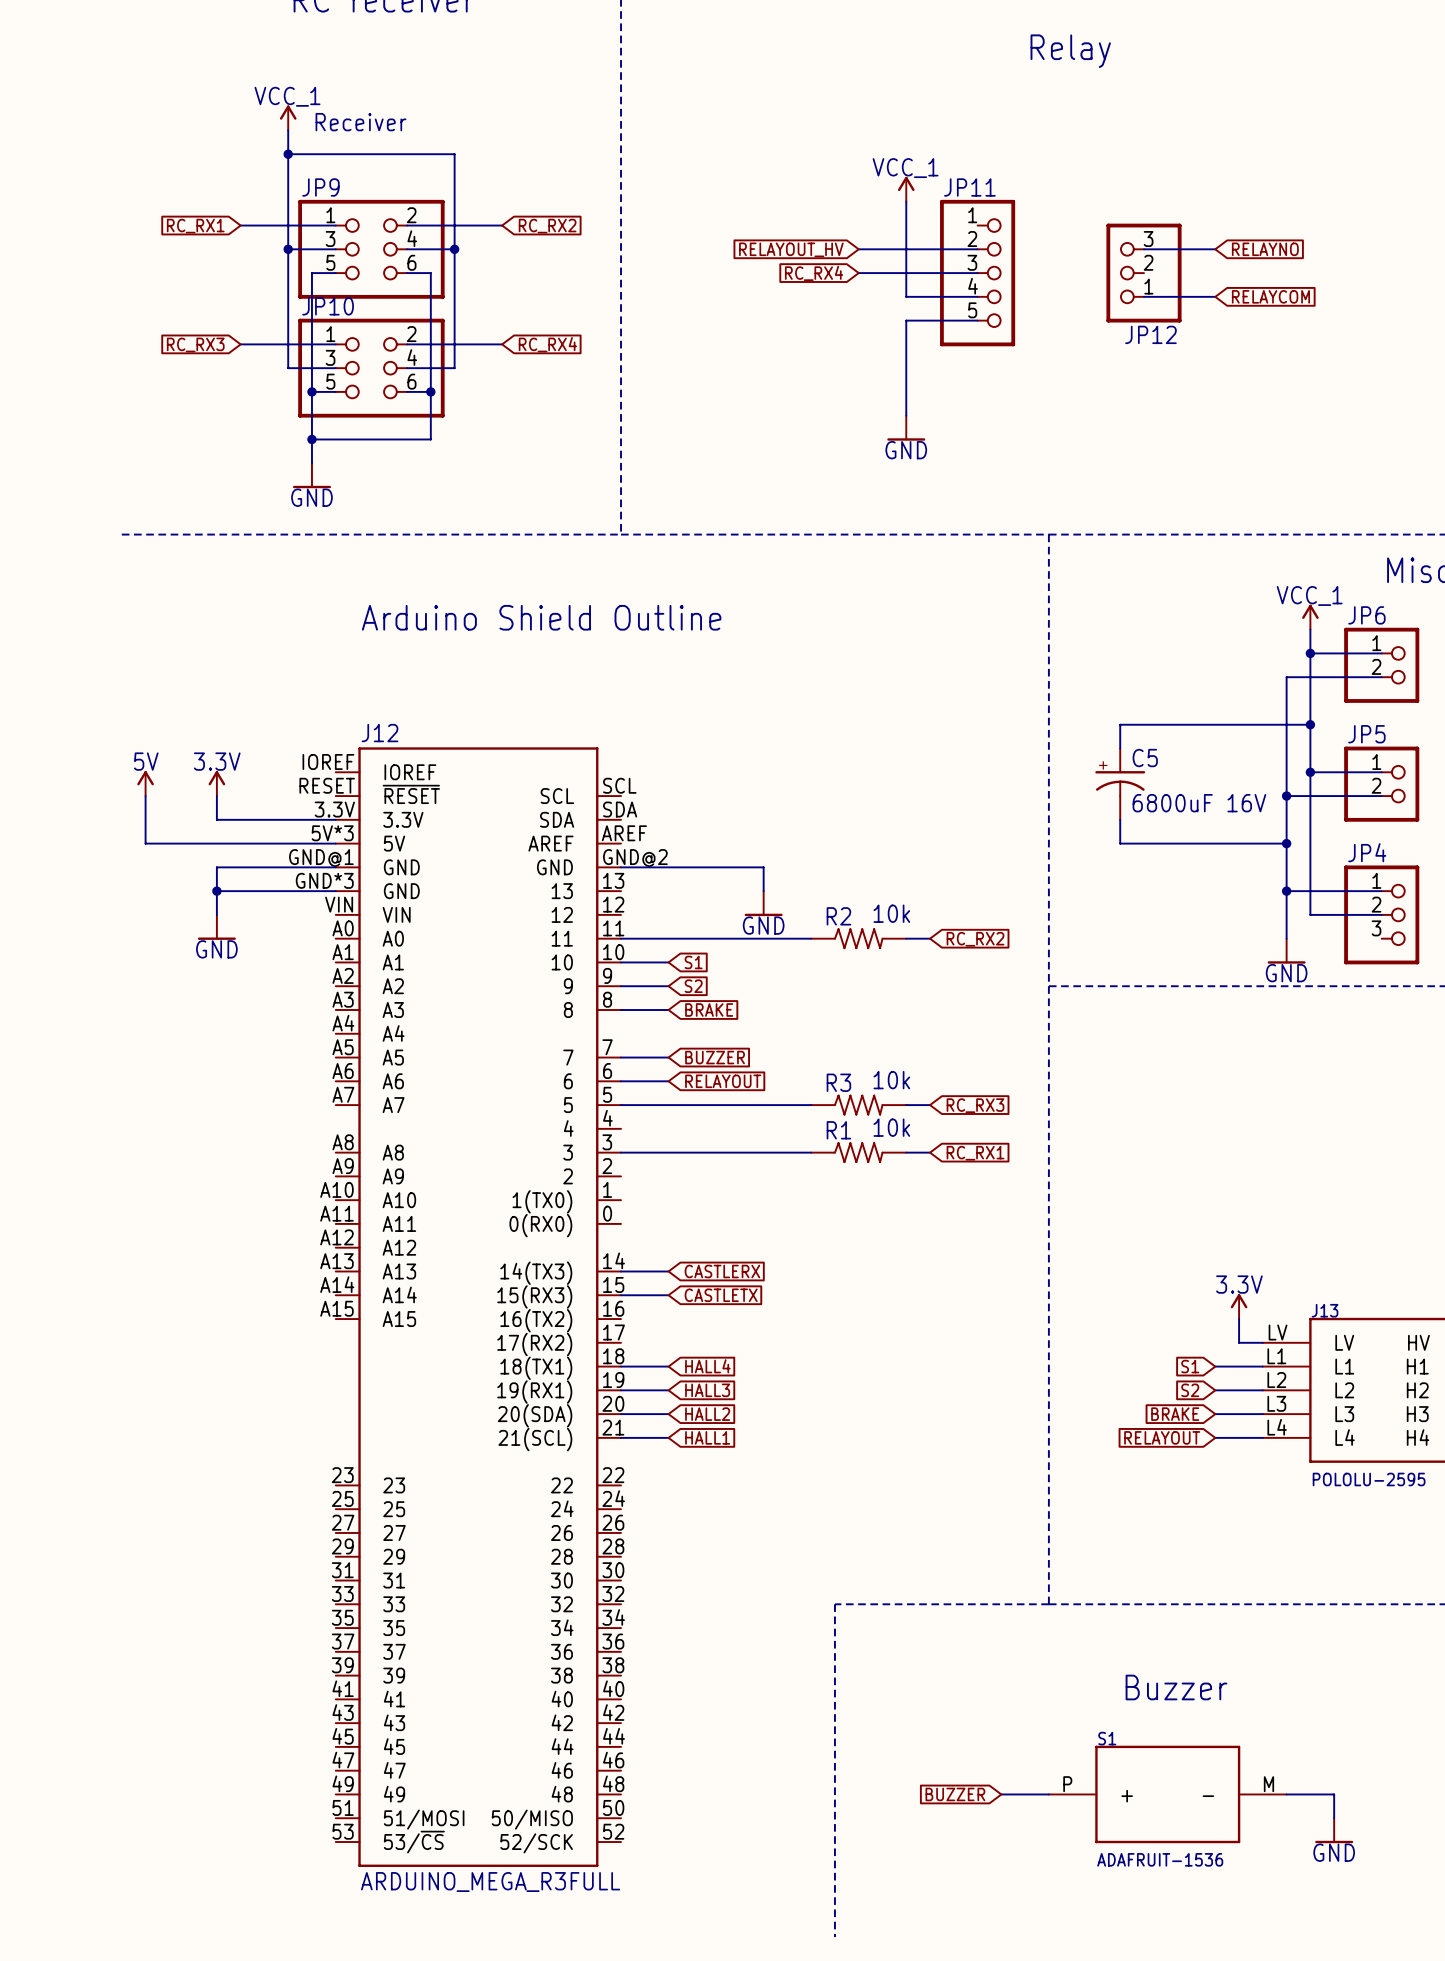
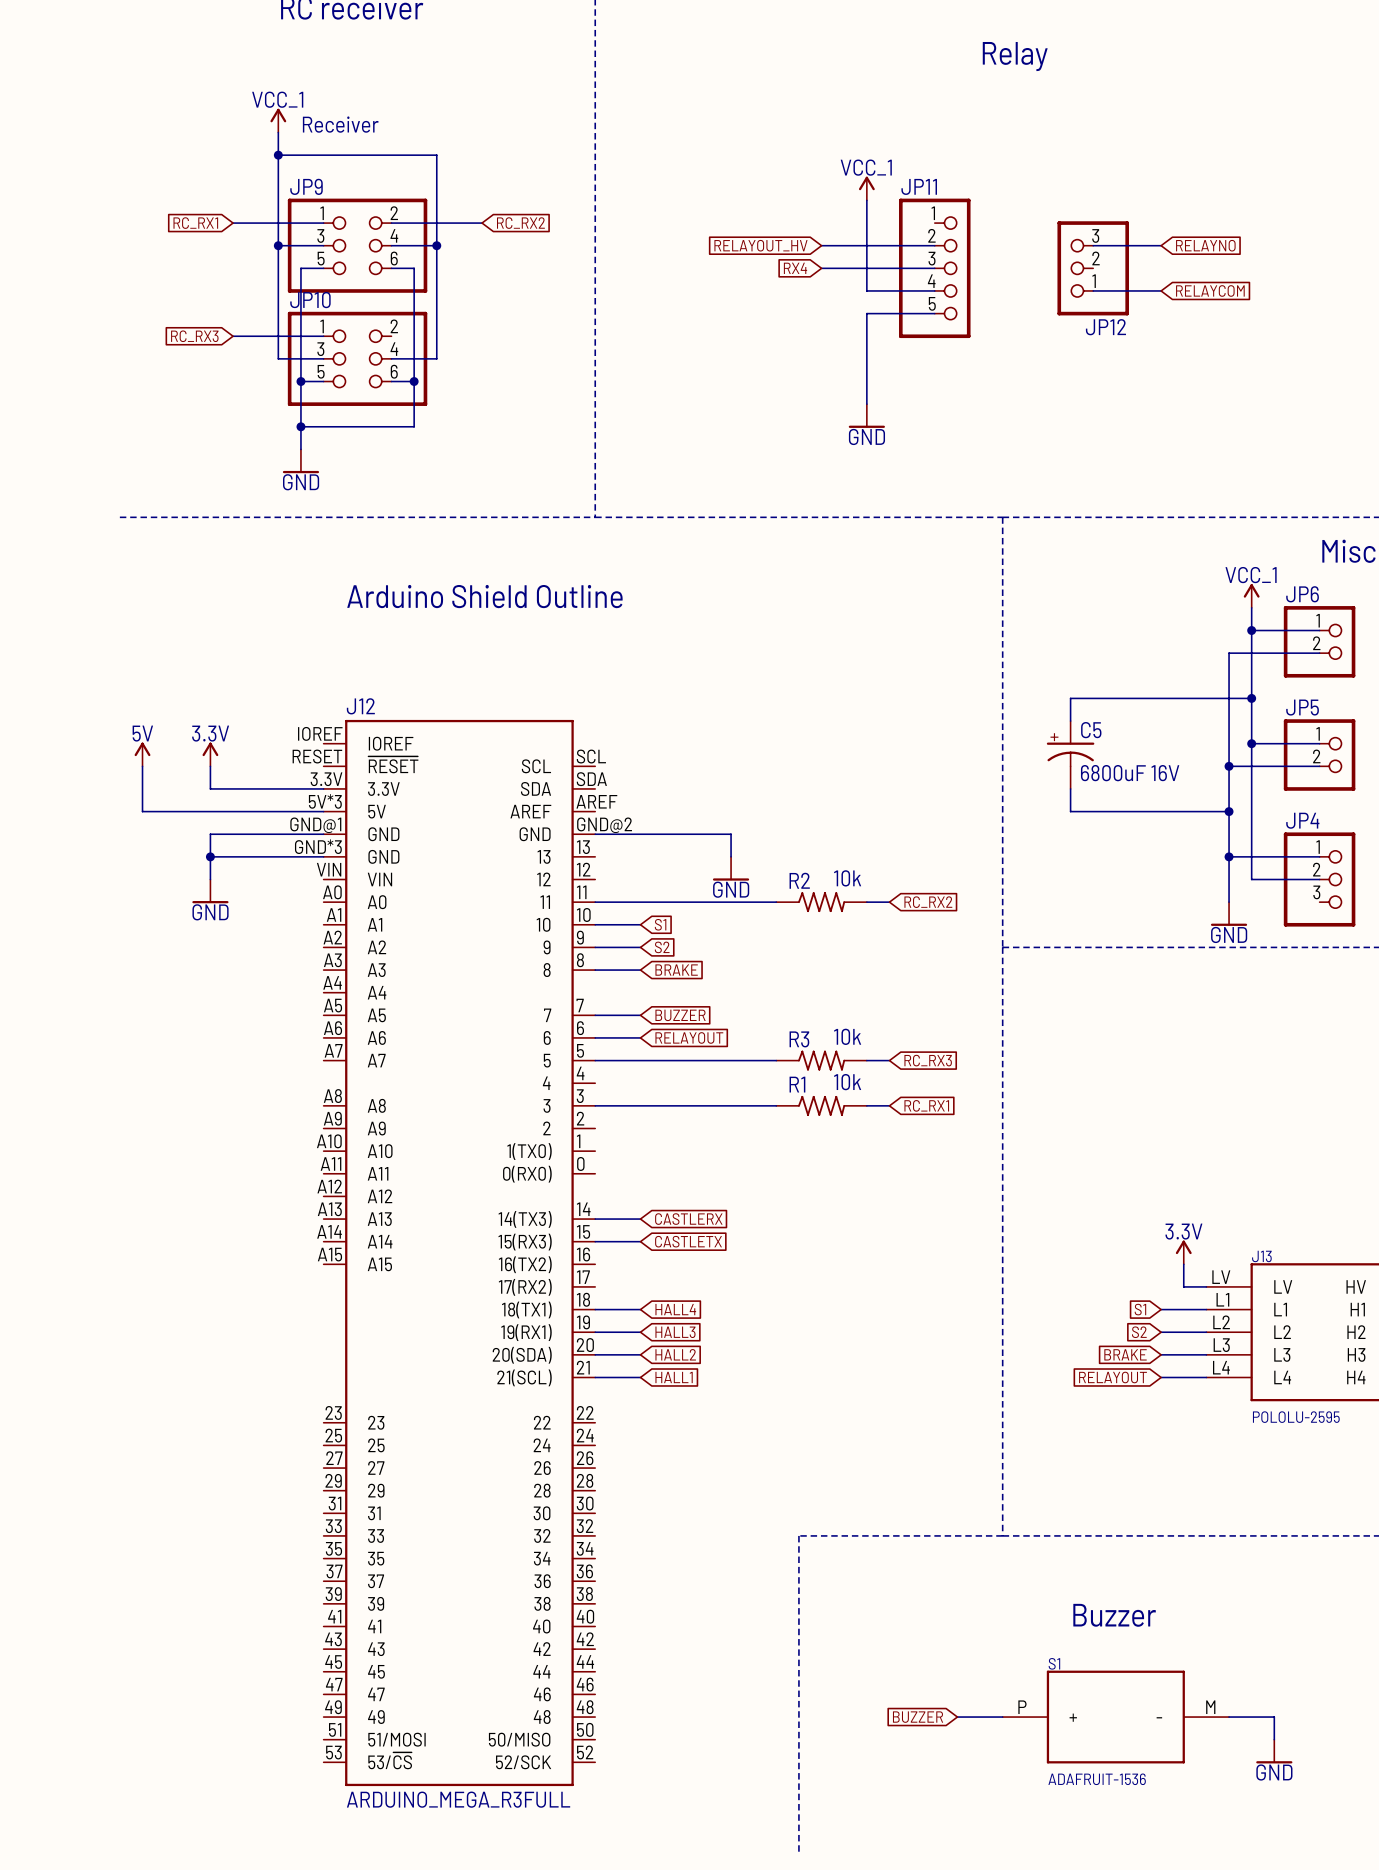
global label: RC_RX4 (814, 273) -> RX4 (795, 268)
wire: (407, 344) (502, 344) -> none
global label: RC_RX4 (547, 344) -> none

